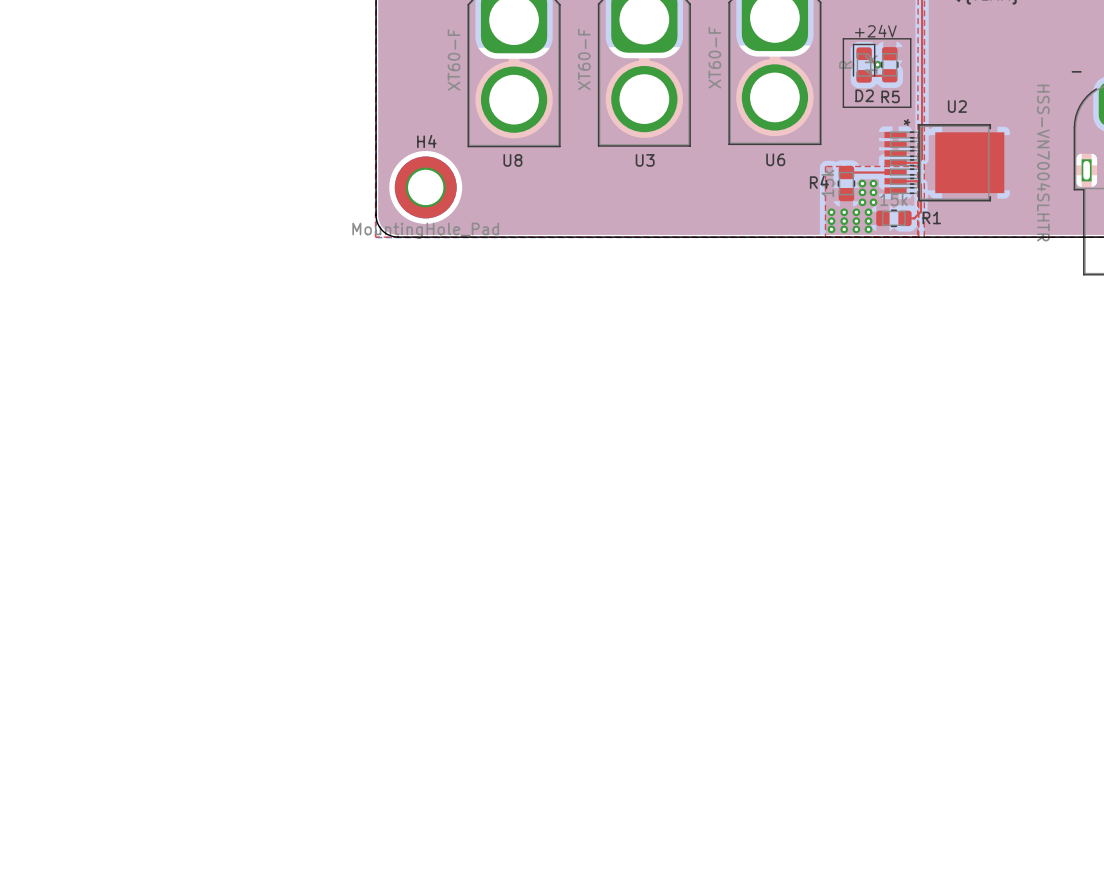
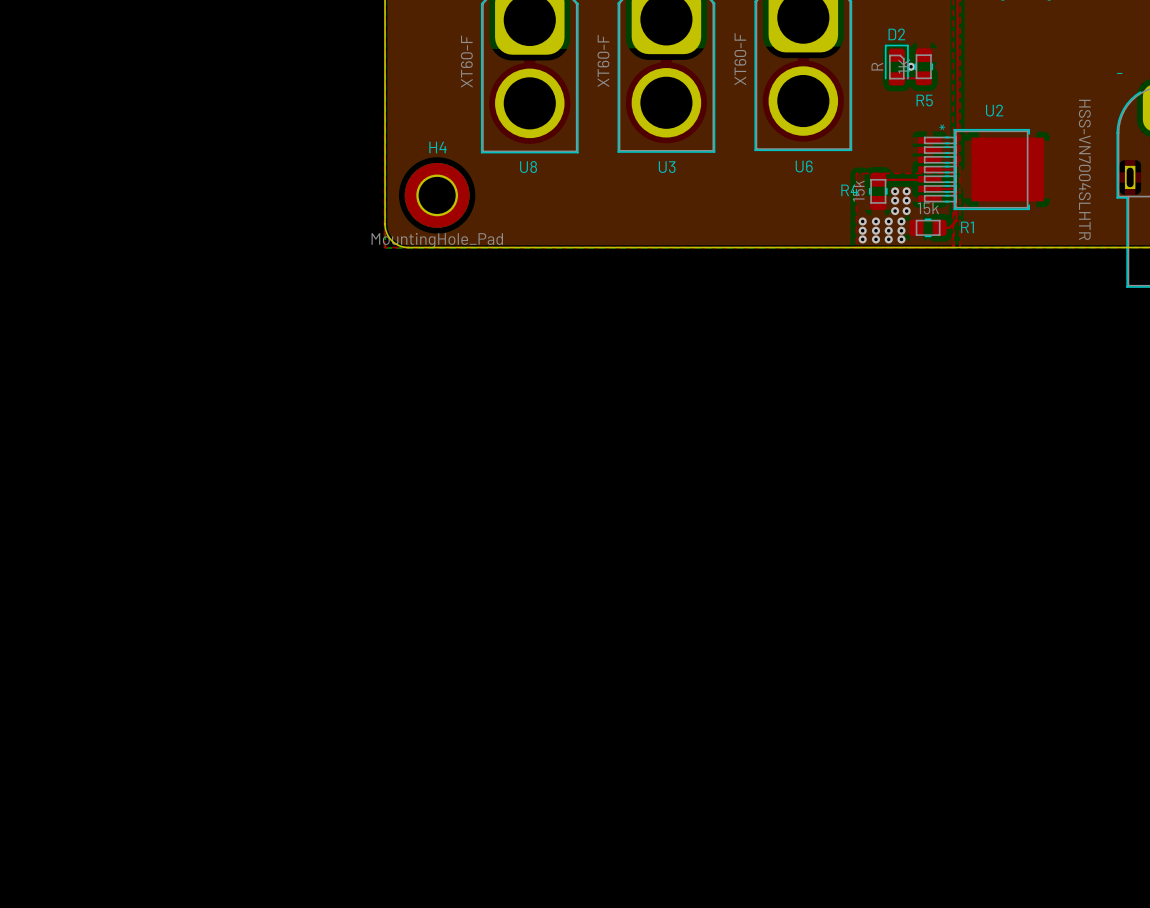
text: +24V (875, 31) -> none
line: (843, 38) (910, 38) (910, 107) (843, 107) (843, 38) -> none
D2 name position: D2 (864, 95) -> D2 (896, 34)

